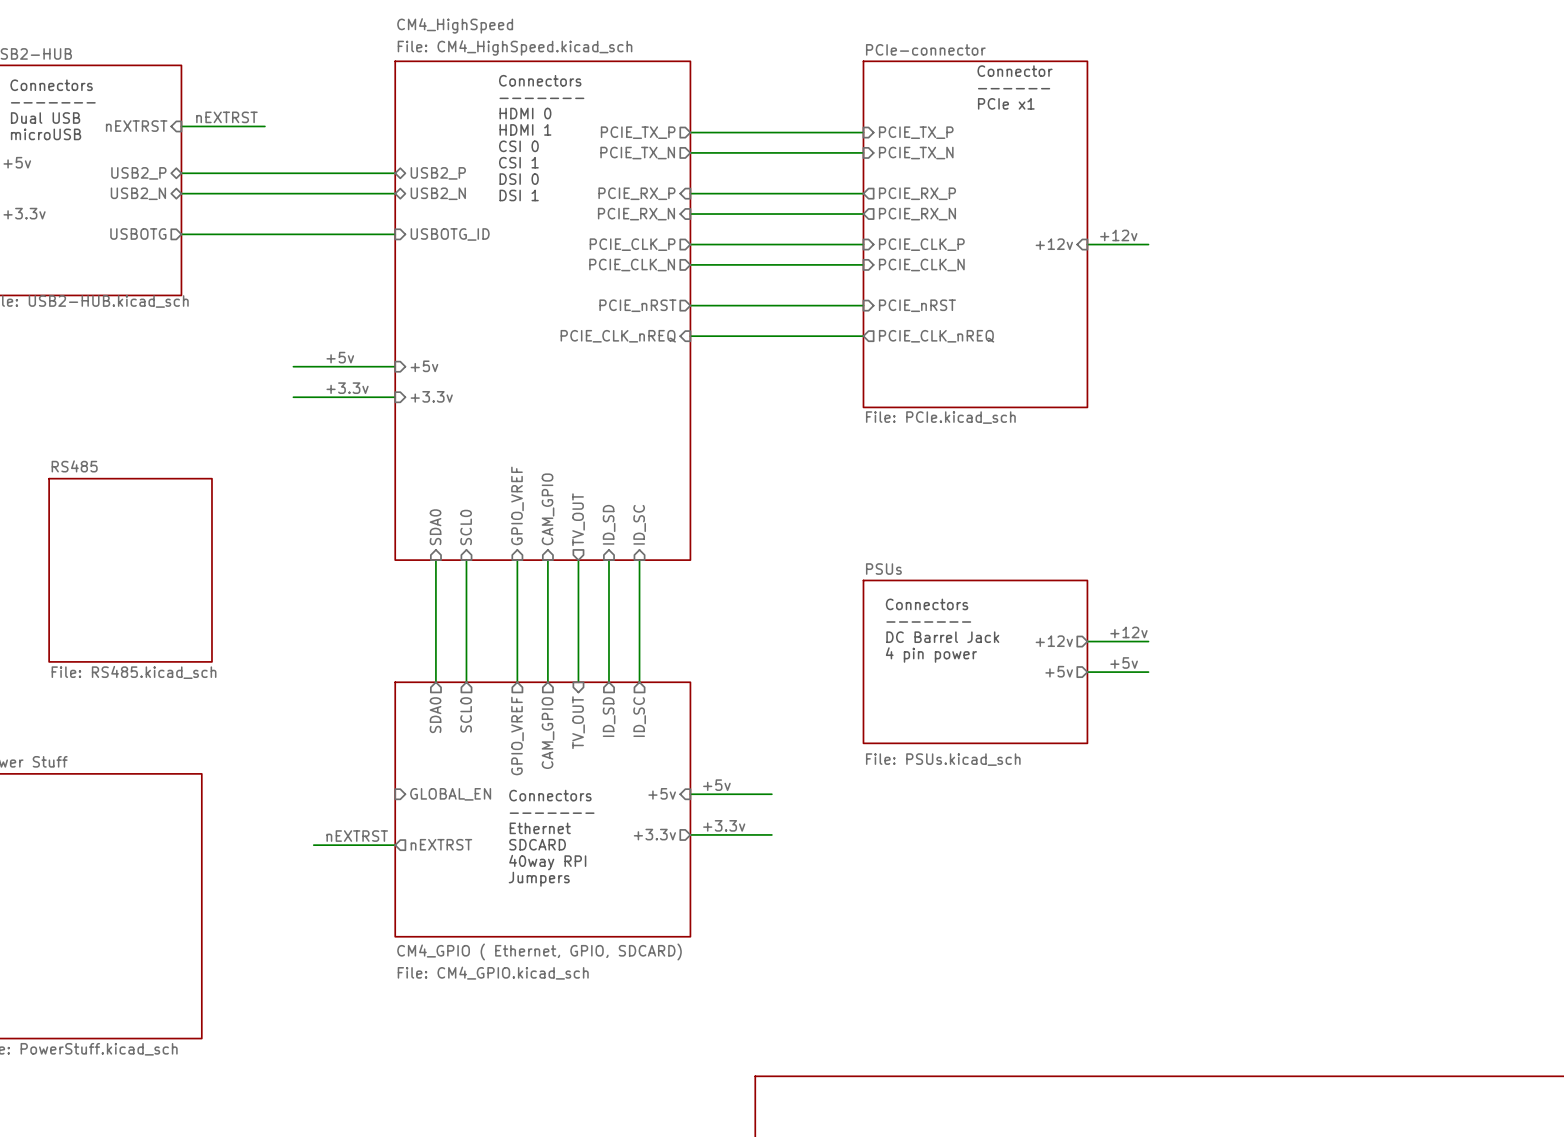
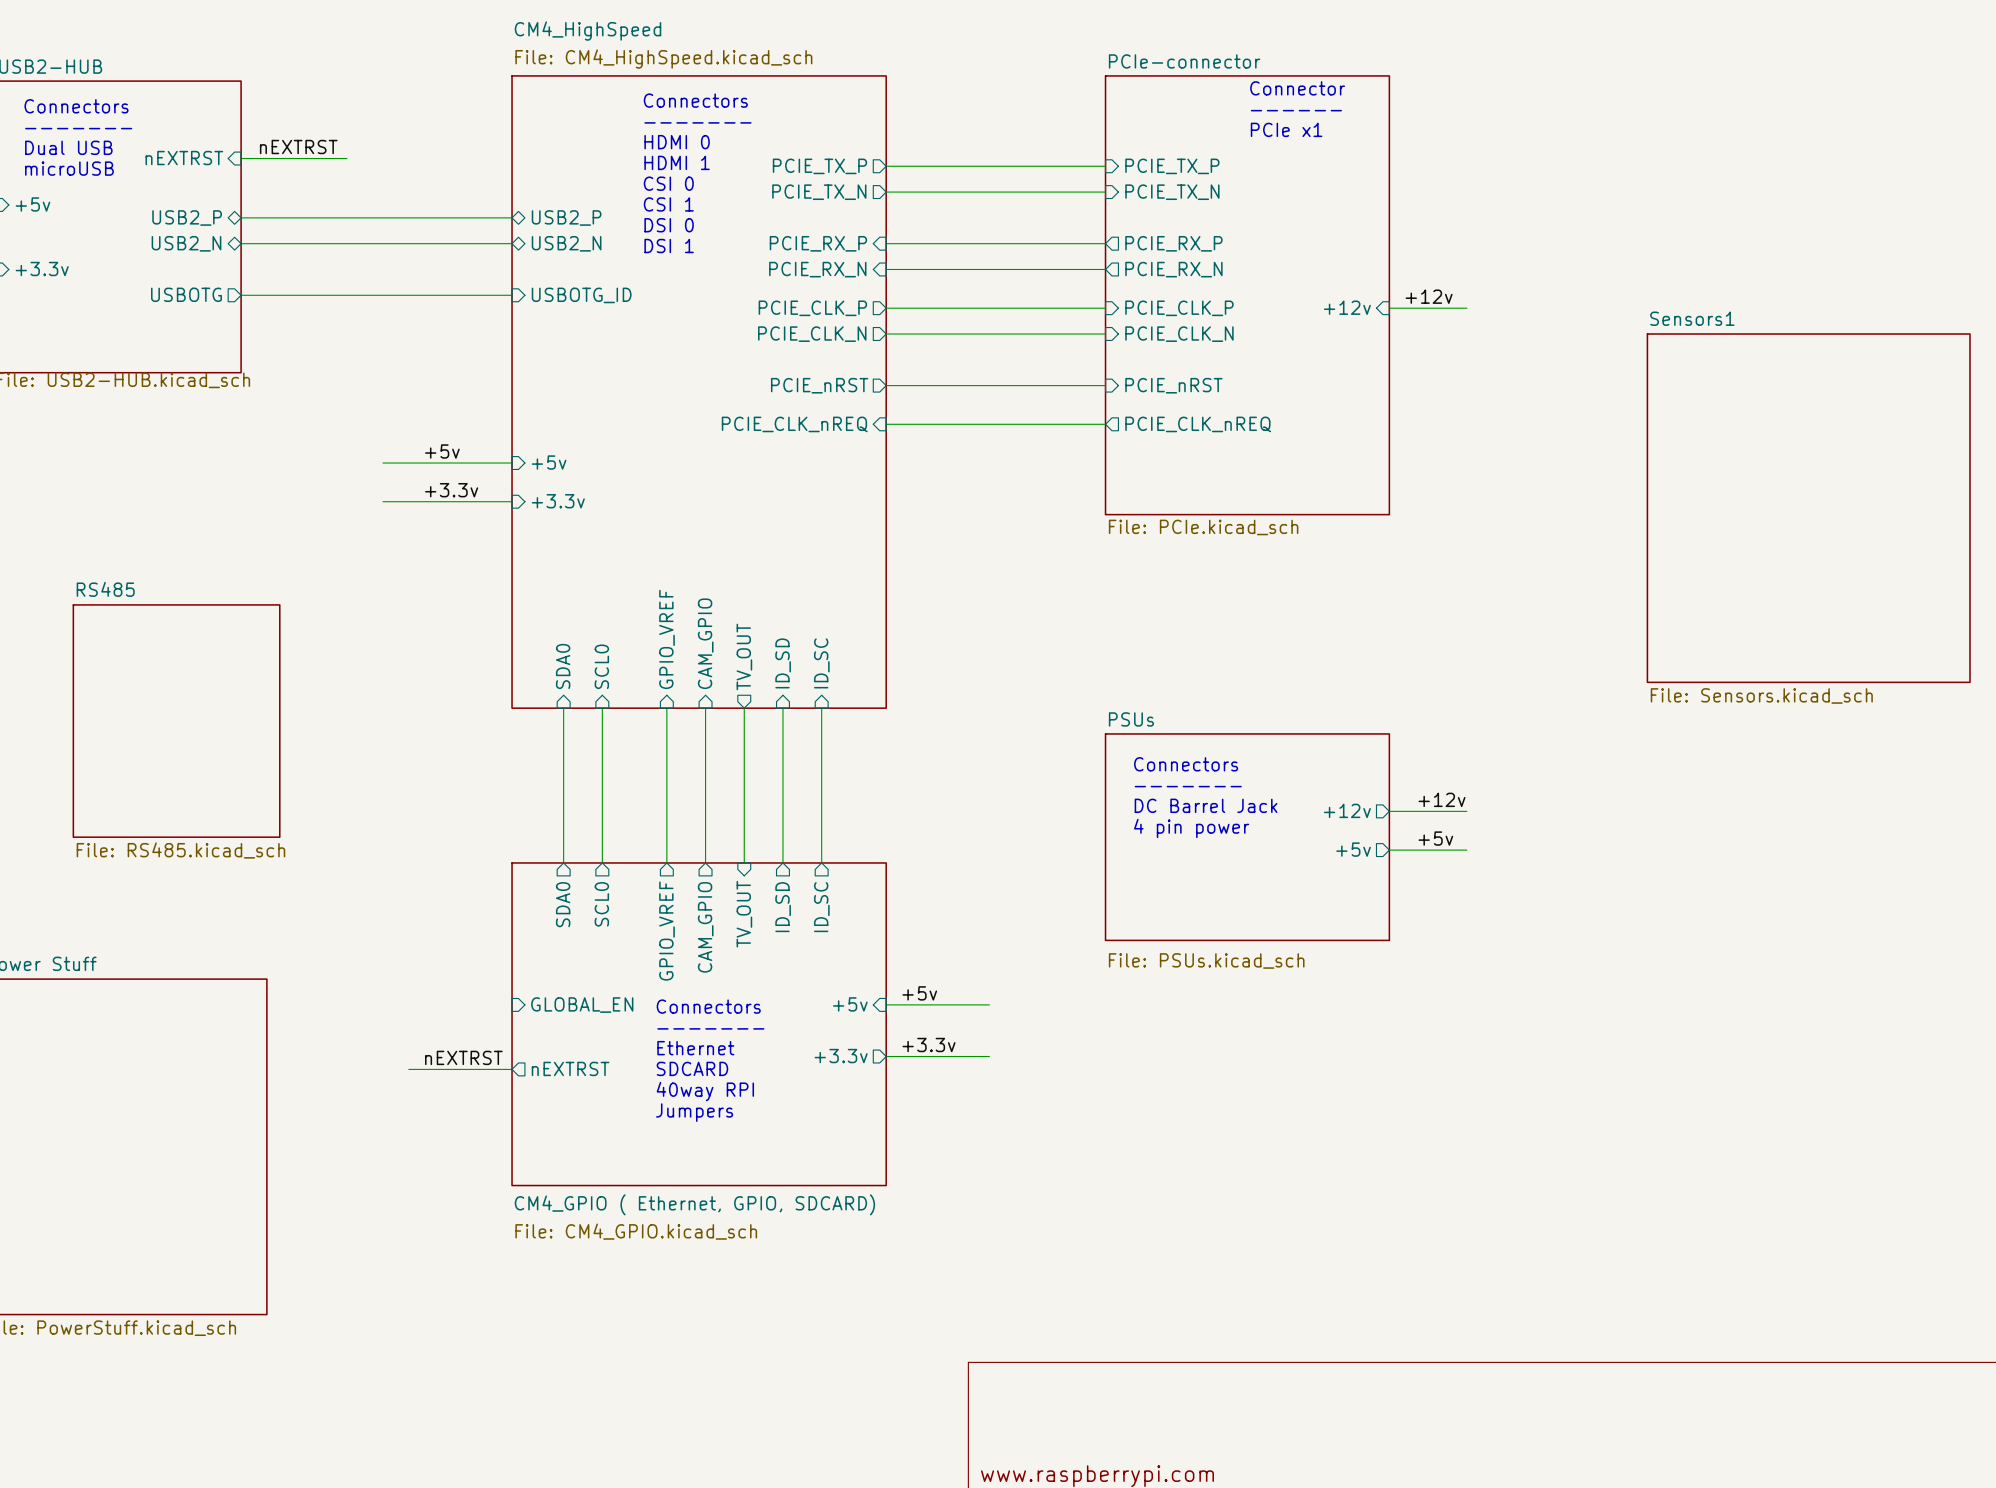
sheet Sensors1: none -> File: Sensors.kicad_sch (1808, 508)

